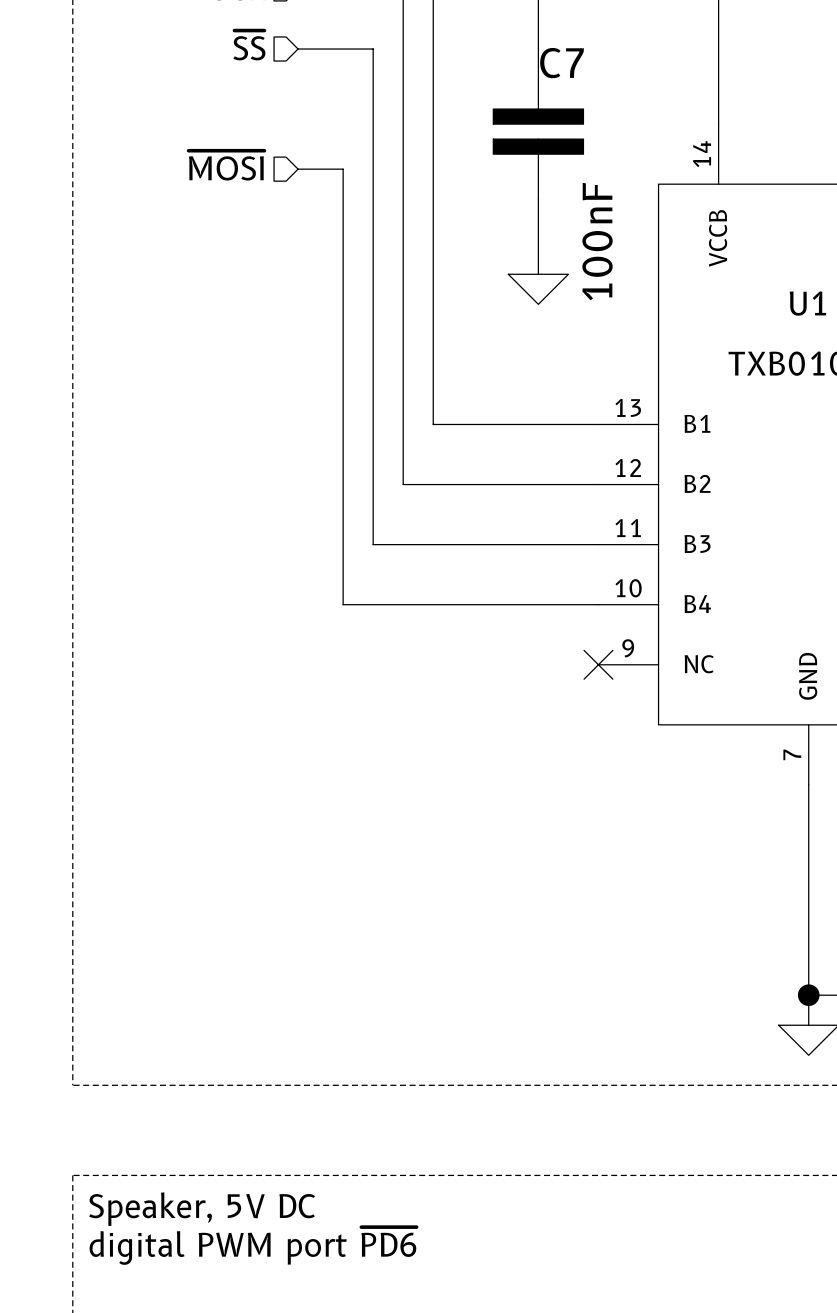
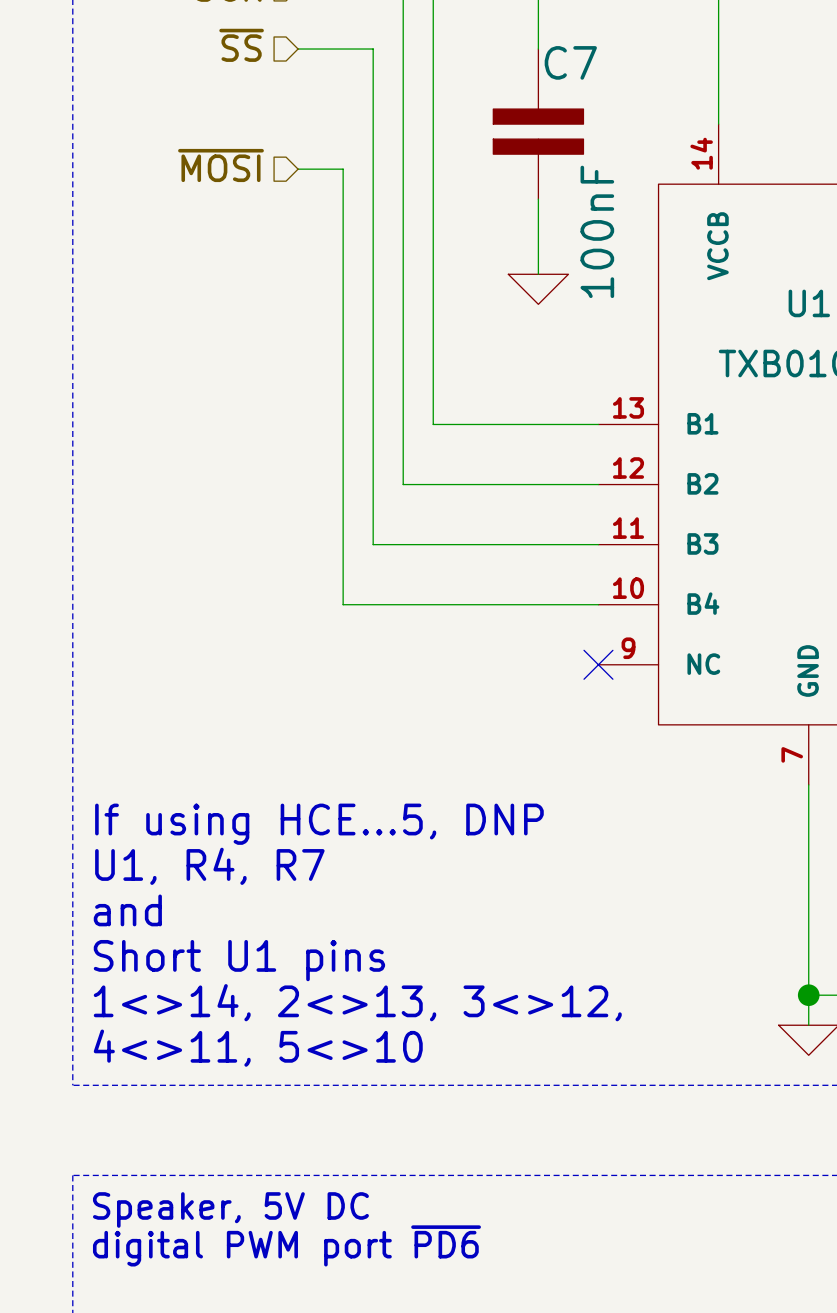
text: none -> If using HCE...5, DNP (319, 824)
text: none -> U1, R4, R7 (209, 866)
text: none -> and (127, 910)
text: none -> Short U1 pins (239, 960)
text: none -> 1<>14, 2<>13, 3<>12, (357, 1002)
text: none -> 4<>11, 5<>10 (258, 1048)

